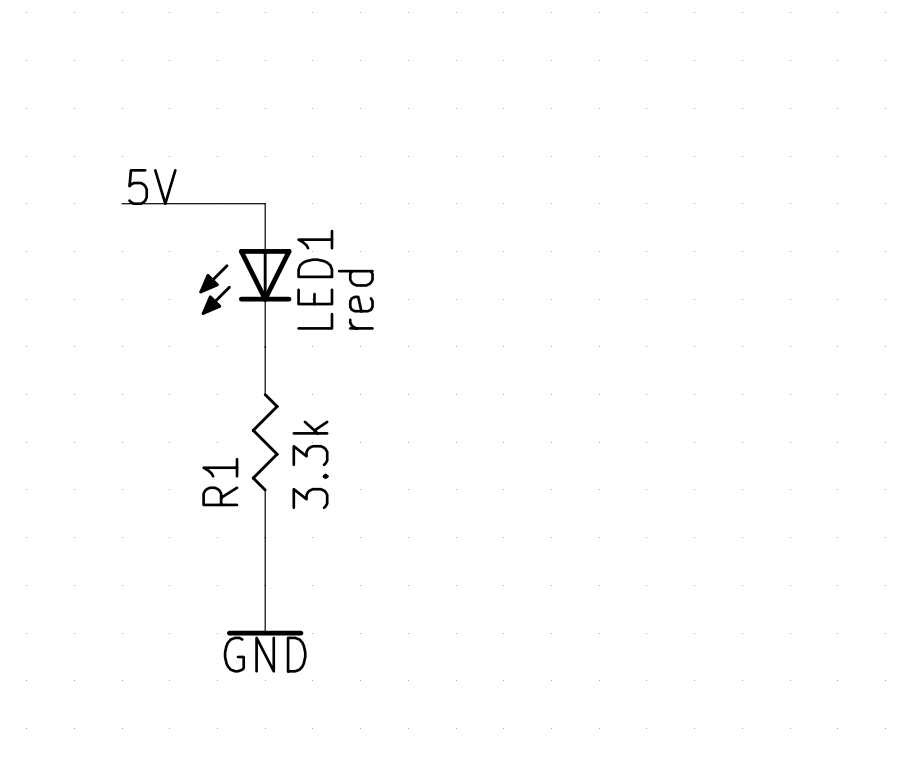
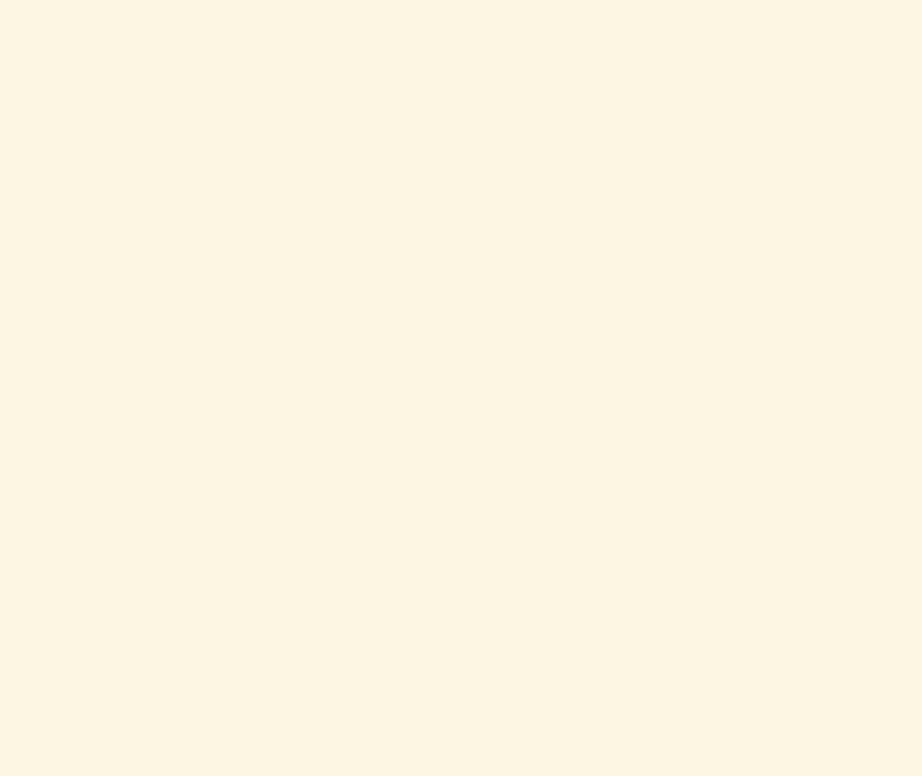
label: 5V (152, 187) -> none
wire: (122, 203) (265, 203) -> none
LED1: red (245, 275) -> none
R1: 3.3k (265, 442) -> none
wire: (265, 537) (265, 585) -> none
power symbol: GND (265, 610) -> none

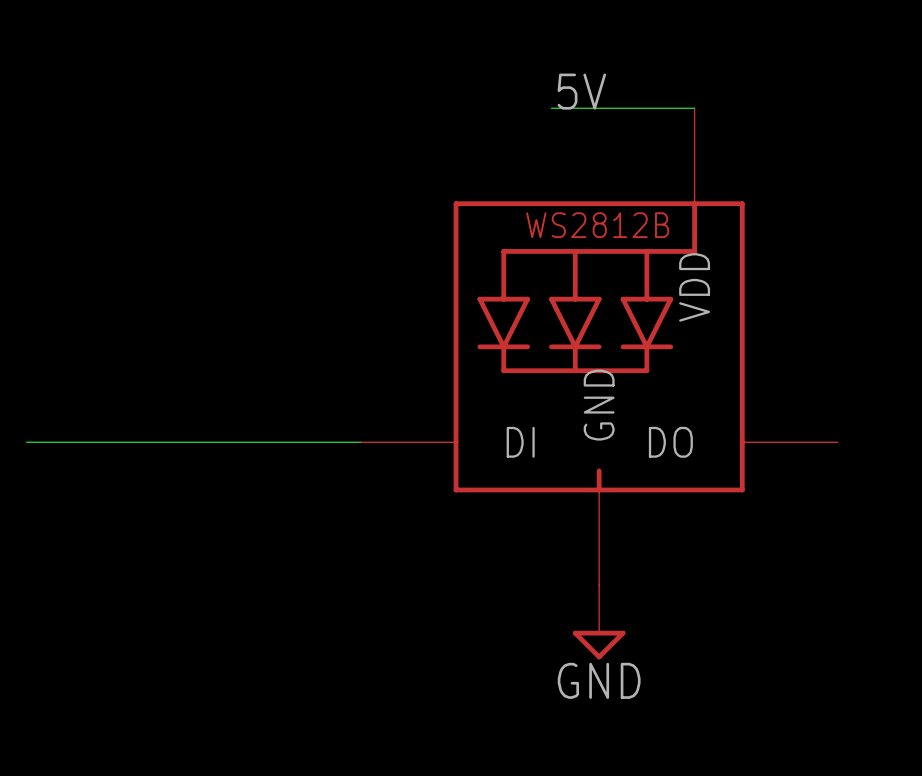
label: none -> 5V (581, 91)
wire: none -> (551, 108) (694, 108)
part: none -> (599, 346)
wire: none -> (26, 442) (360, 442)
power symbol: none -> GND (599, 622)

